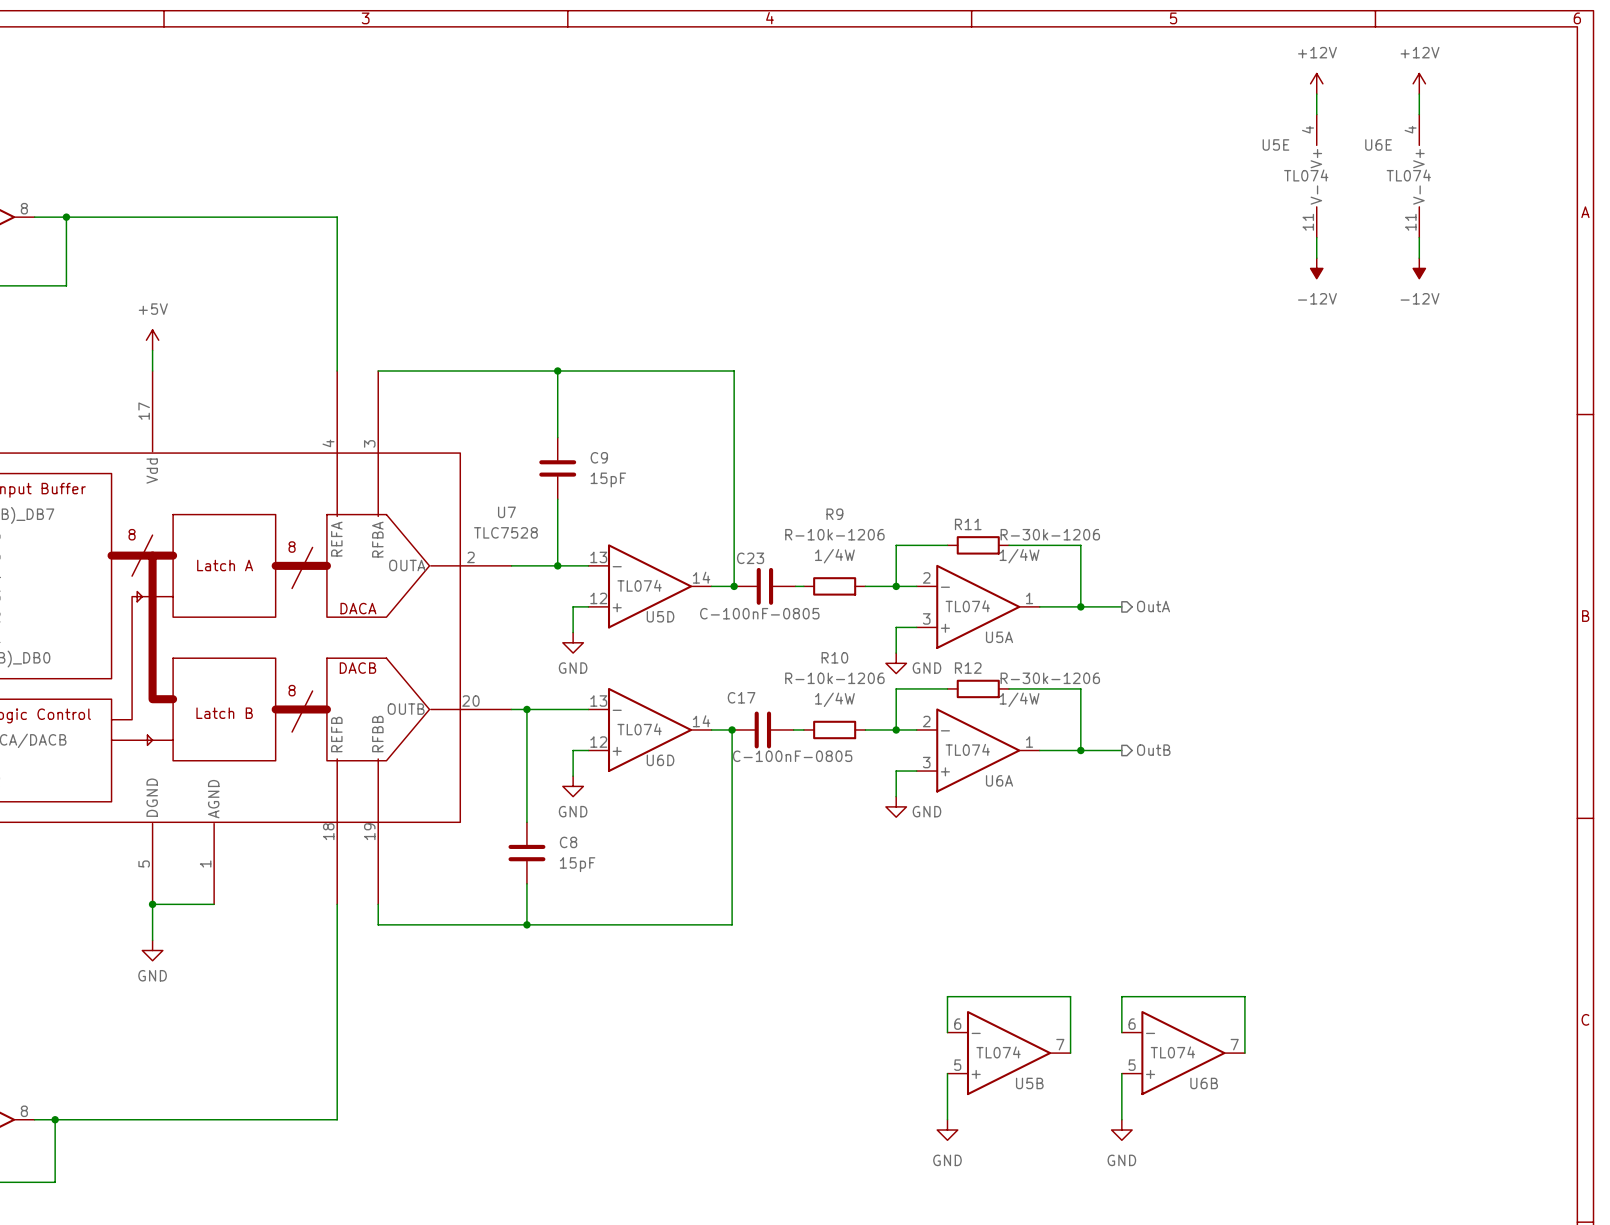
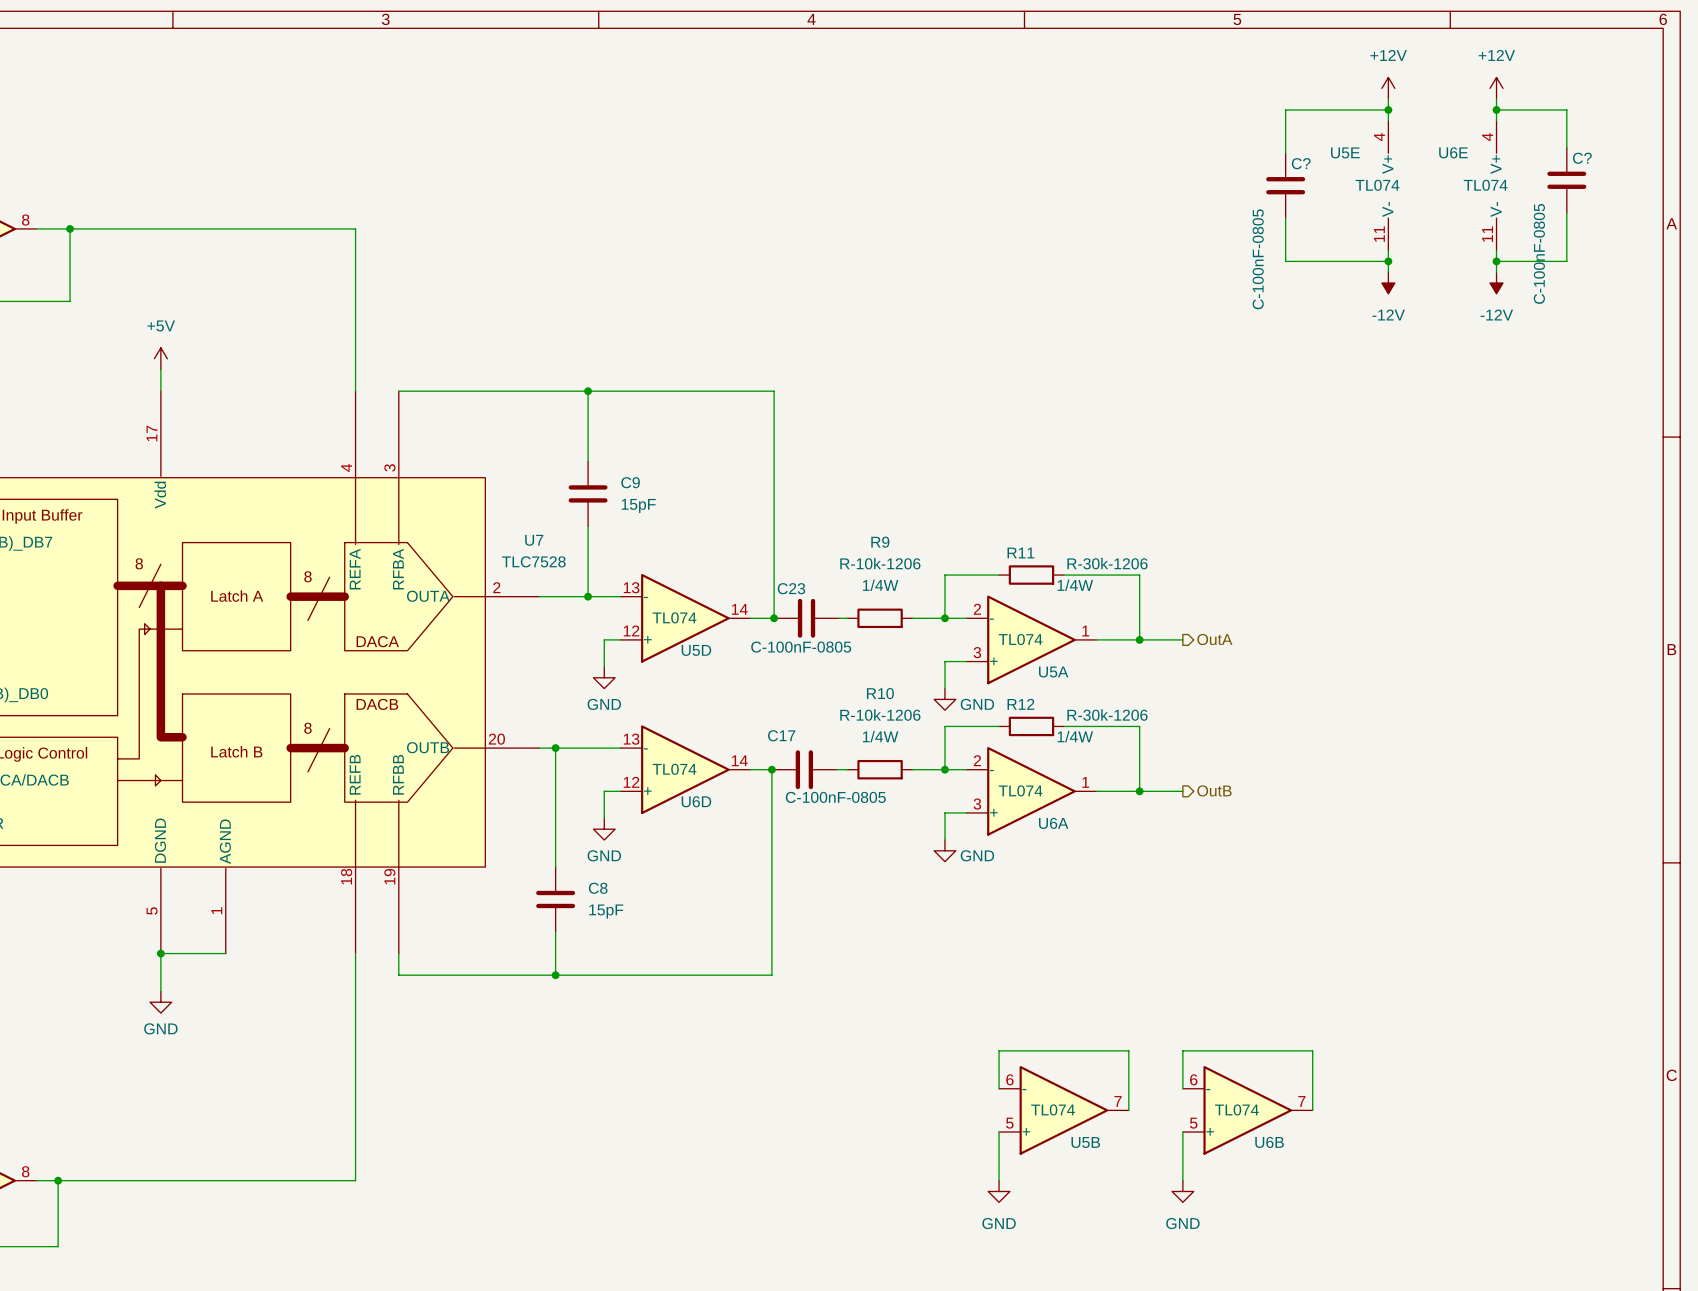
wire: none -> (1388, 109) (1285, 109) (1285, 153)
junction: none -> (1388, 109)
wire: none -> (1496, 109) (1566, 109) (1566, 147)
junction: none -> (1496, 109)
C?: none -> C-100nF-0805 (1566, 180)
C?: none -> C-100nF-0805 (1285, 185)
wire: none -> (1566, 212) (1566, 261) (1496, 261)
wire: none -> (1285, 218) (1285, 261) (1388, 261)
junction: none -> (1388, 261)
junction: none -> (1496, 261)

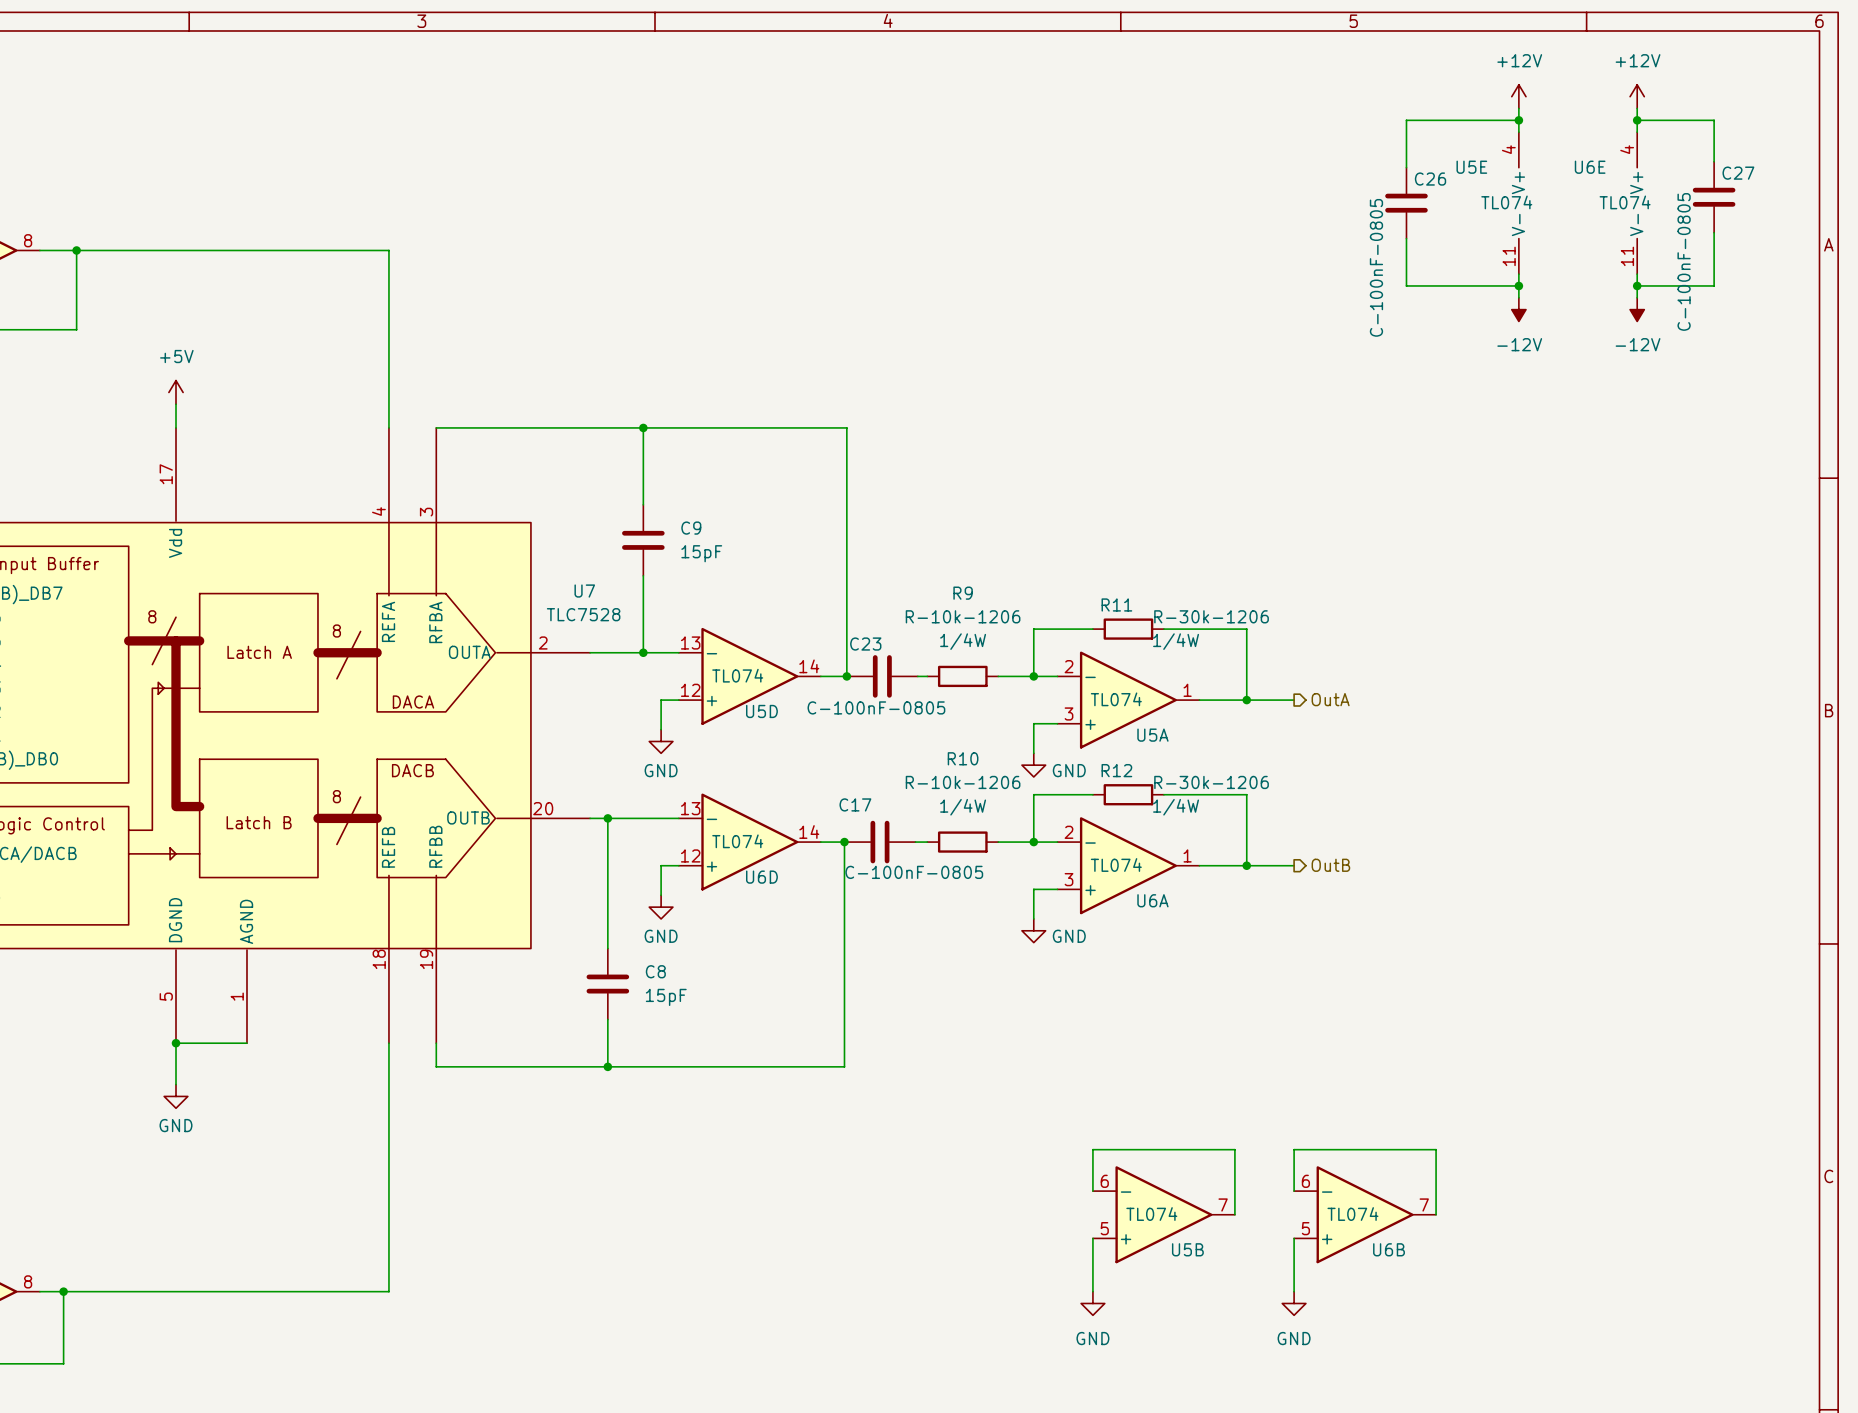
C? name: C? (1582, 158) -> C27 (1738, 173)
C? name: C? (1301, 163) -> C26 (1430, 179)

